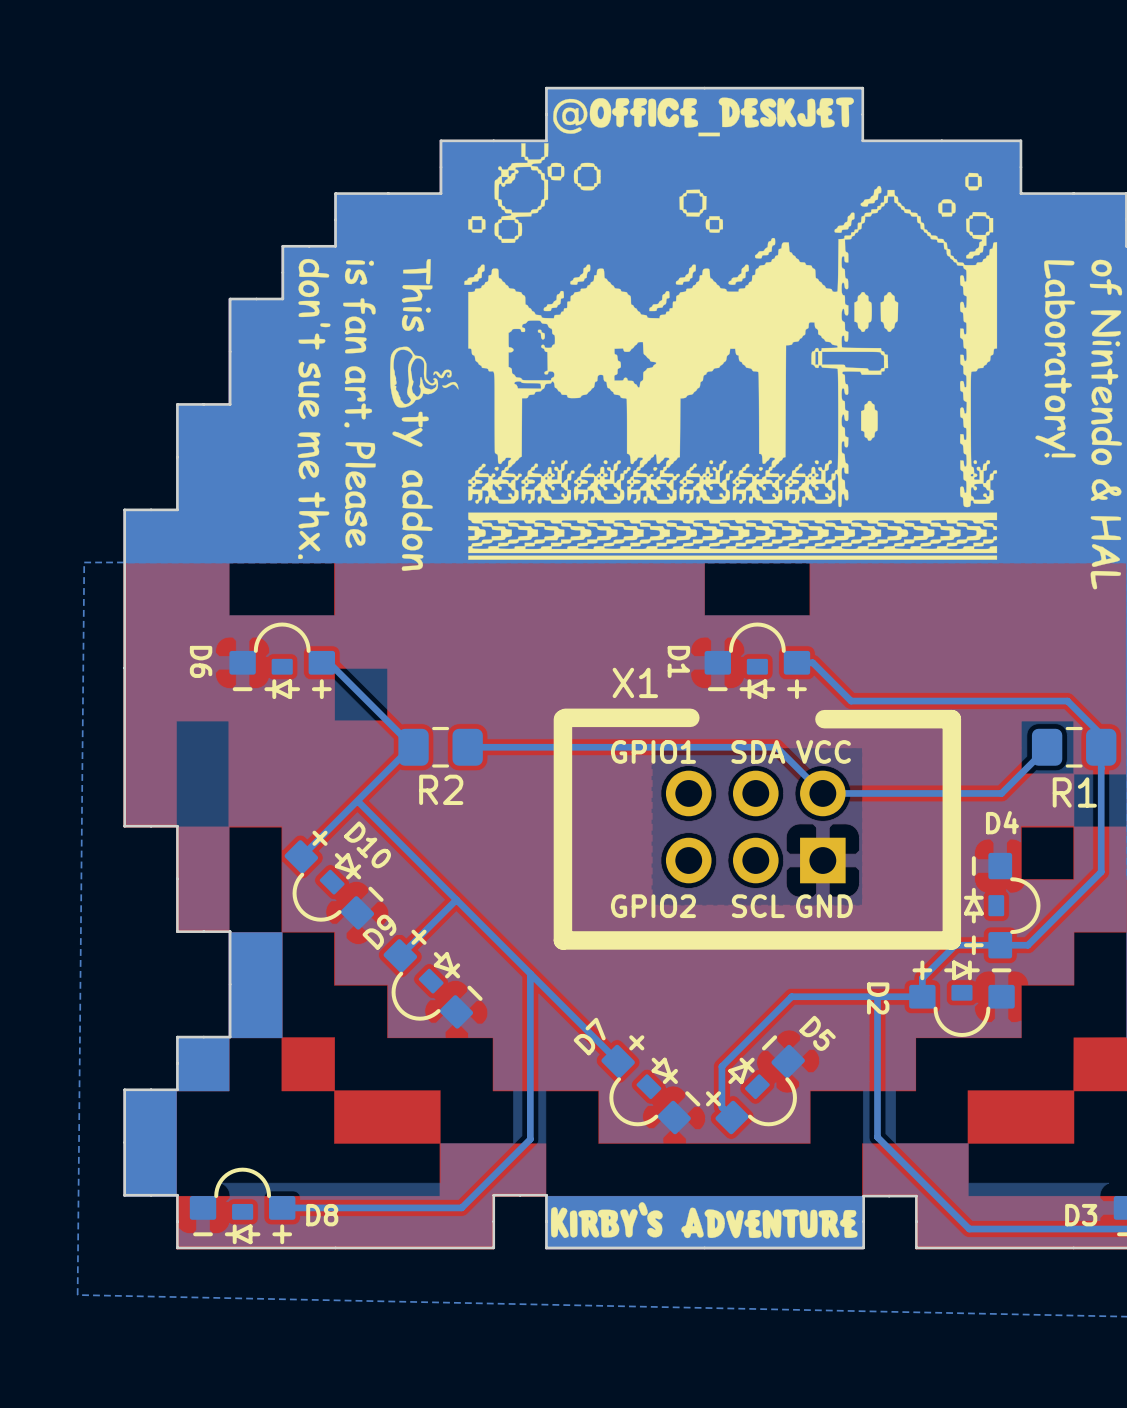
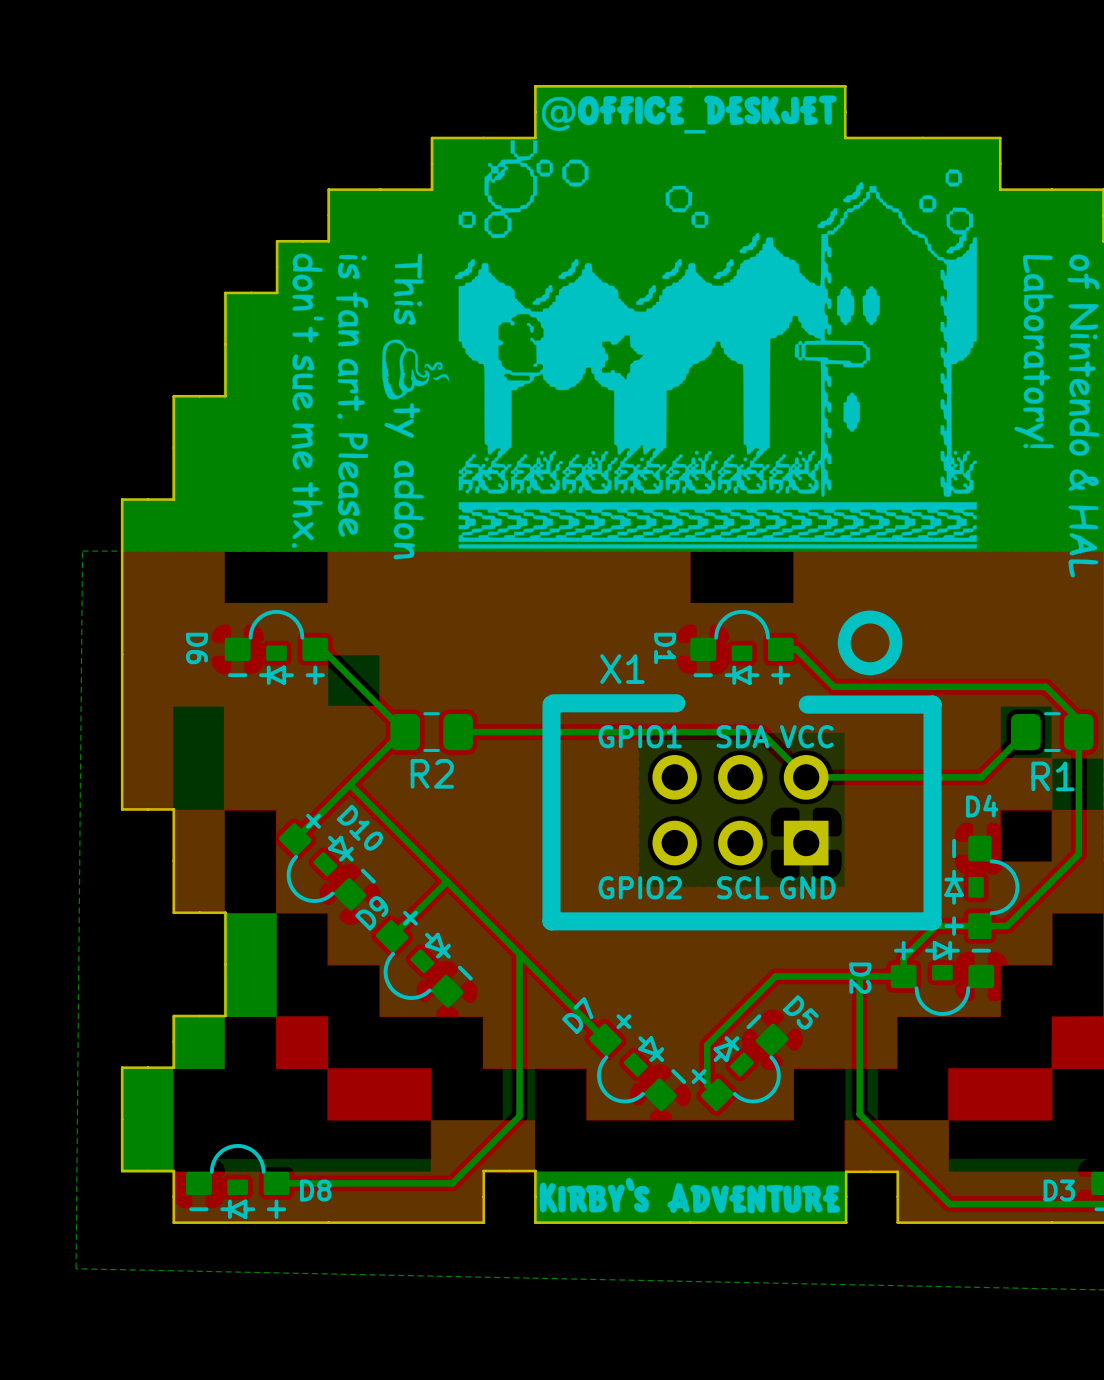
X1 footprint: [553, 708, 962, 950] -> [542, 610, 942, 931]

